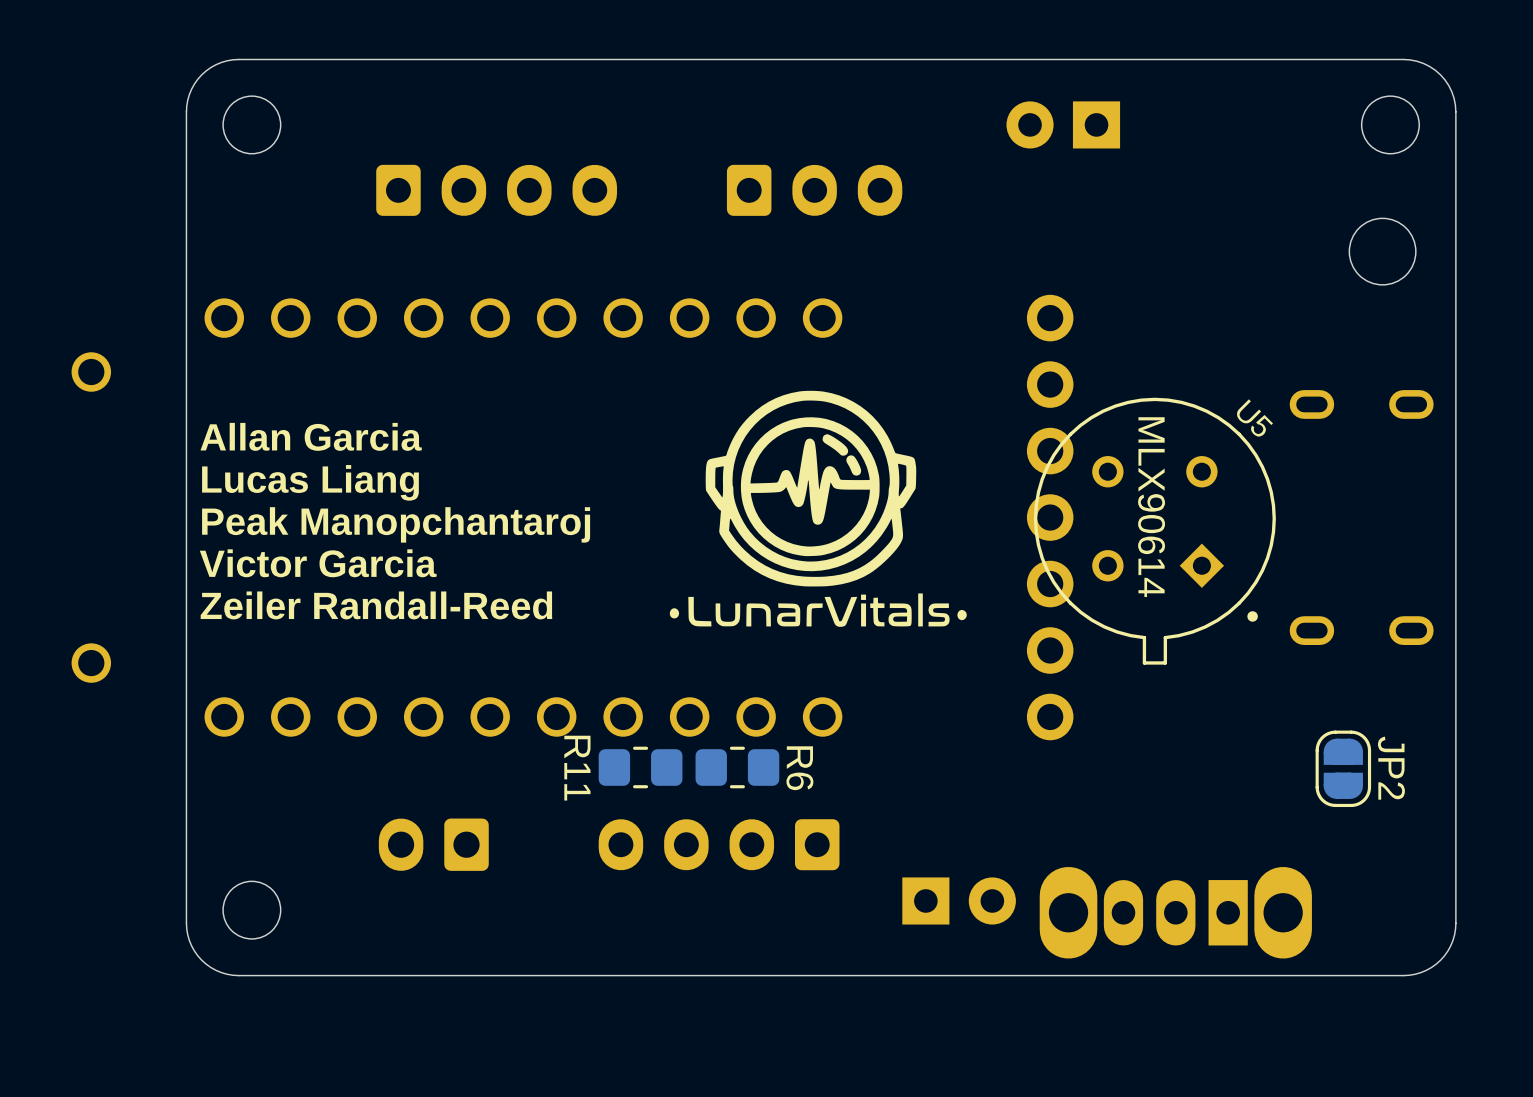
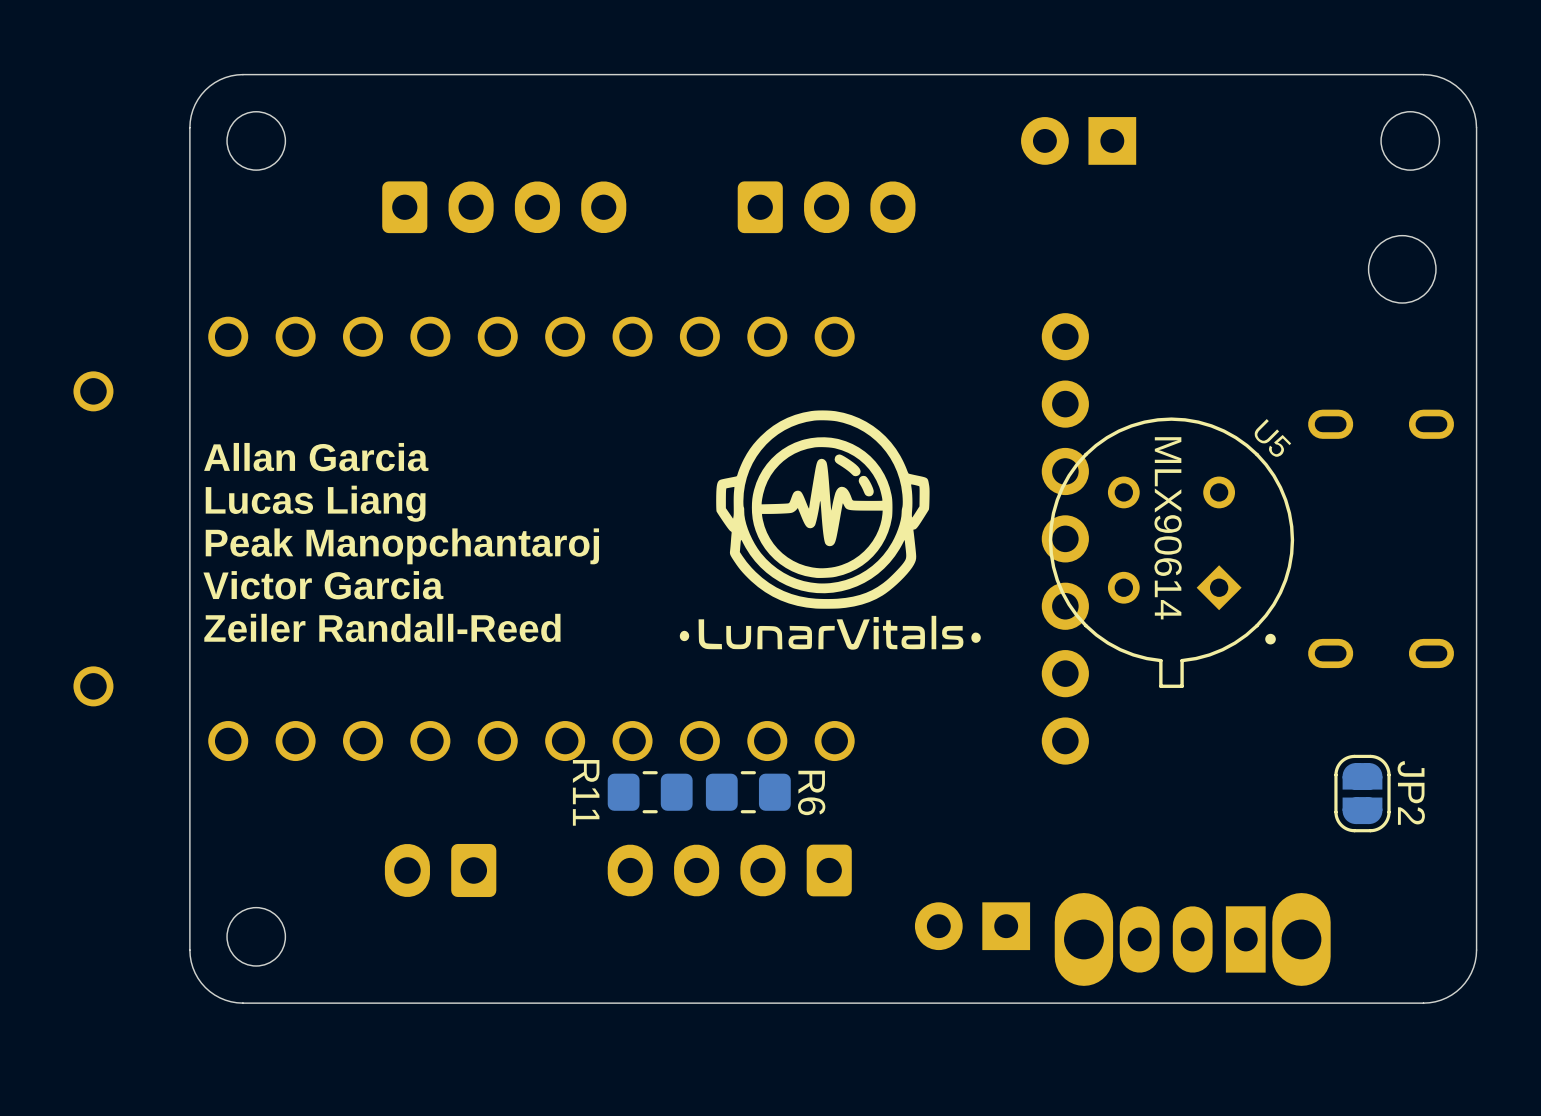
part rotation: 0° (959, 900) -> 180° (972, 926)

